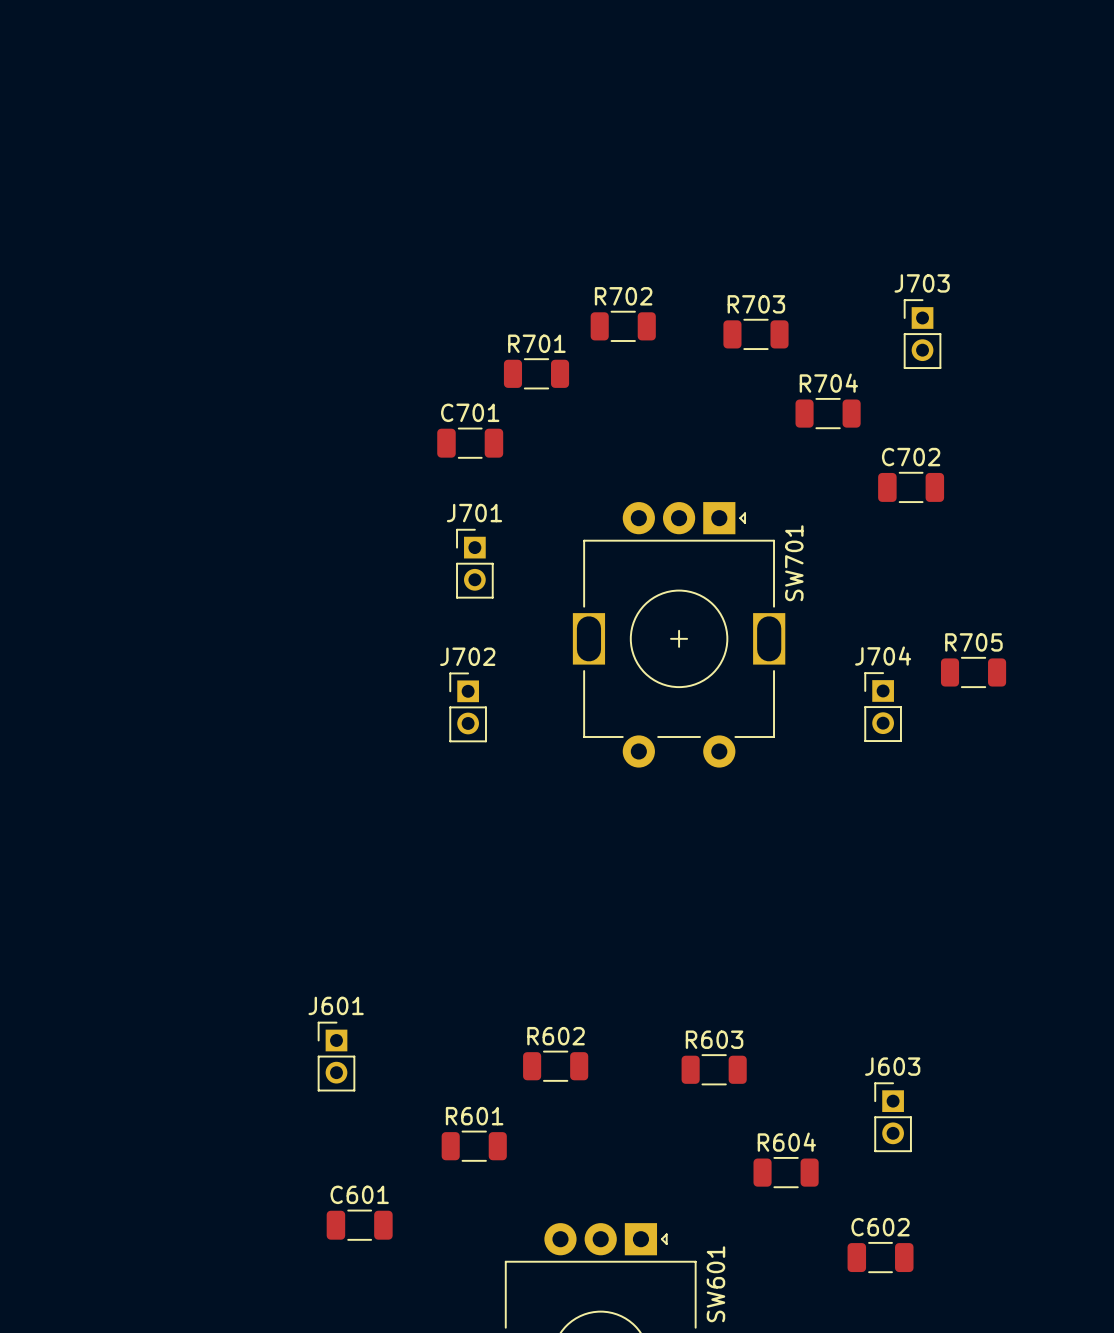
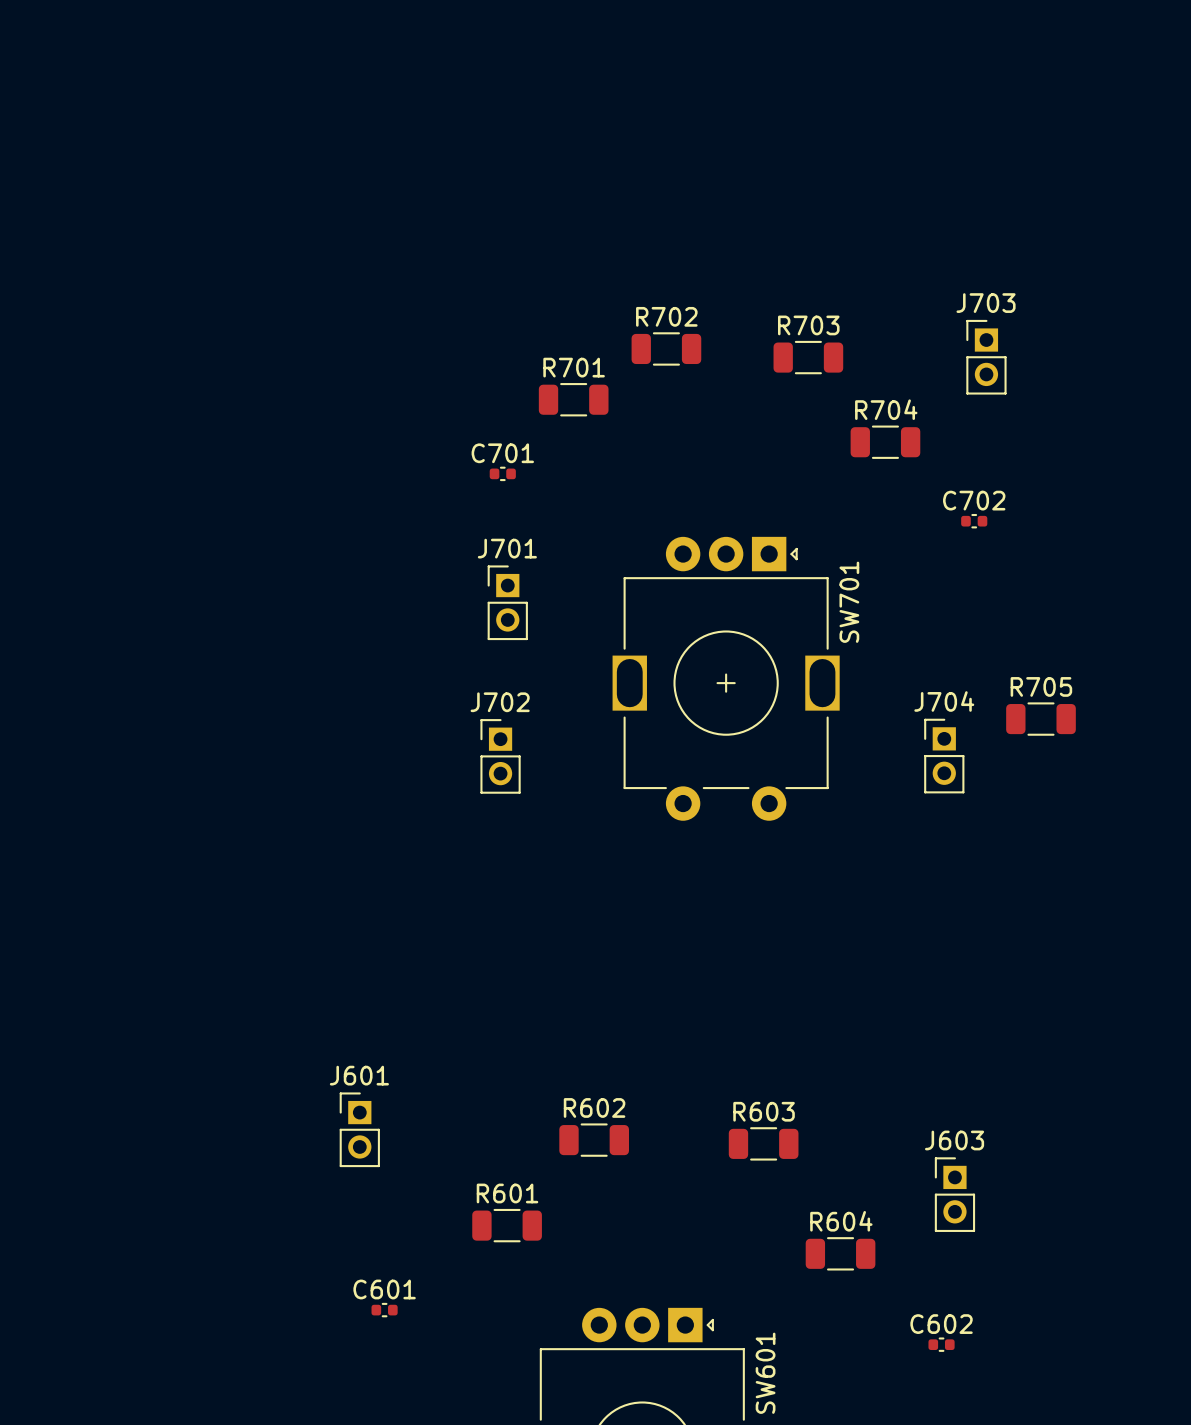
C701 footprint: [437, 427, 504, 459] -> [489, 466, 516, 482]
C702 footprint: [878, 471, 945, 504] -> [961, 513, 988, 529]
C601 footprint: [326, 1209, 393, 1241] -> [371, 1302, 398, 1318]
C602 footprint: [847, 1241, 914, 1274] -> [928, 1337, 955, 1352]

